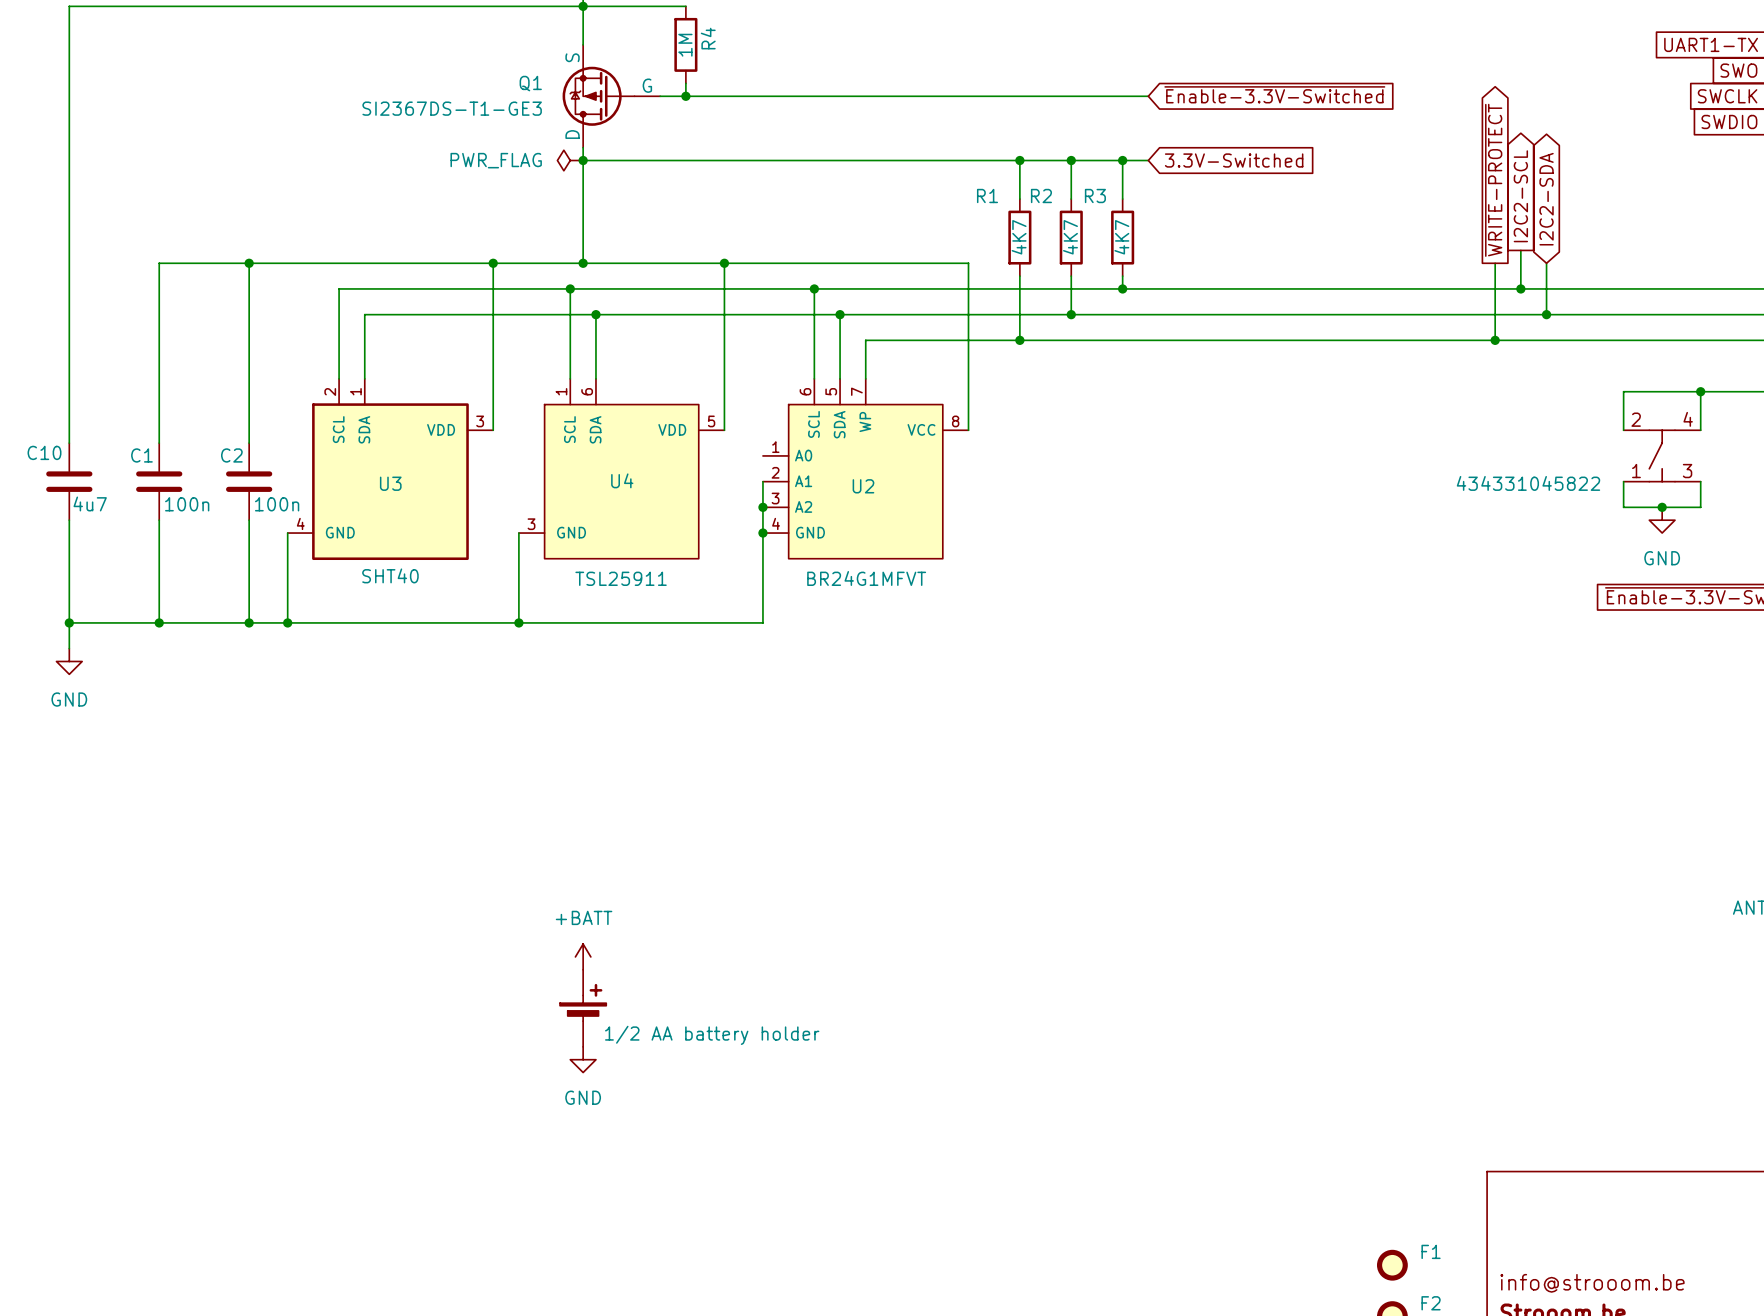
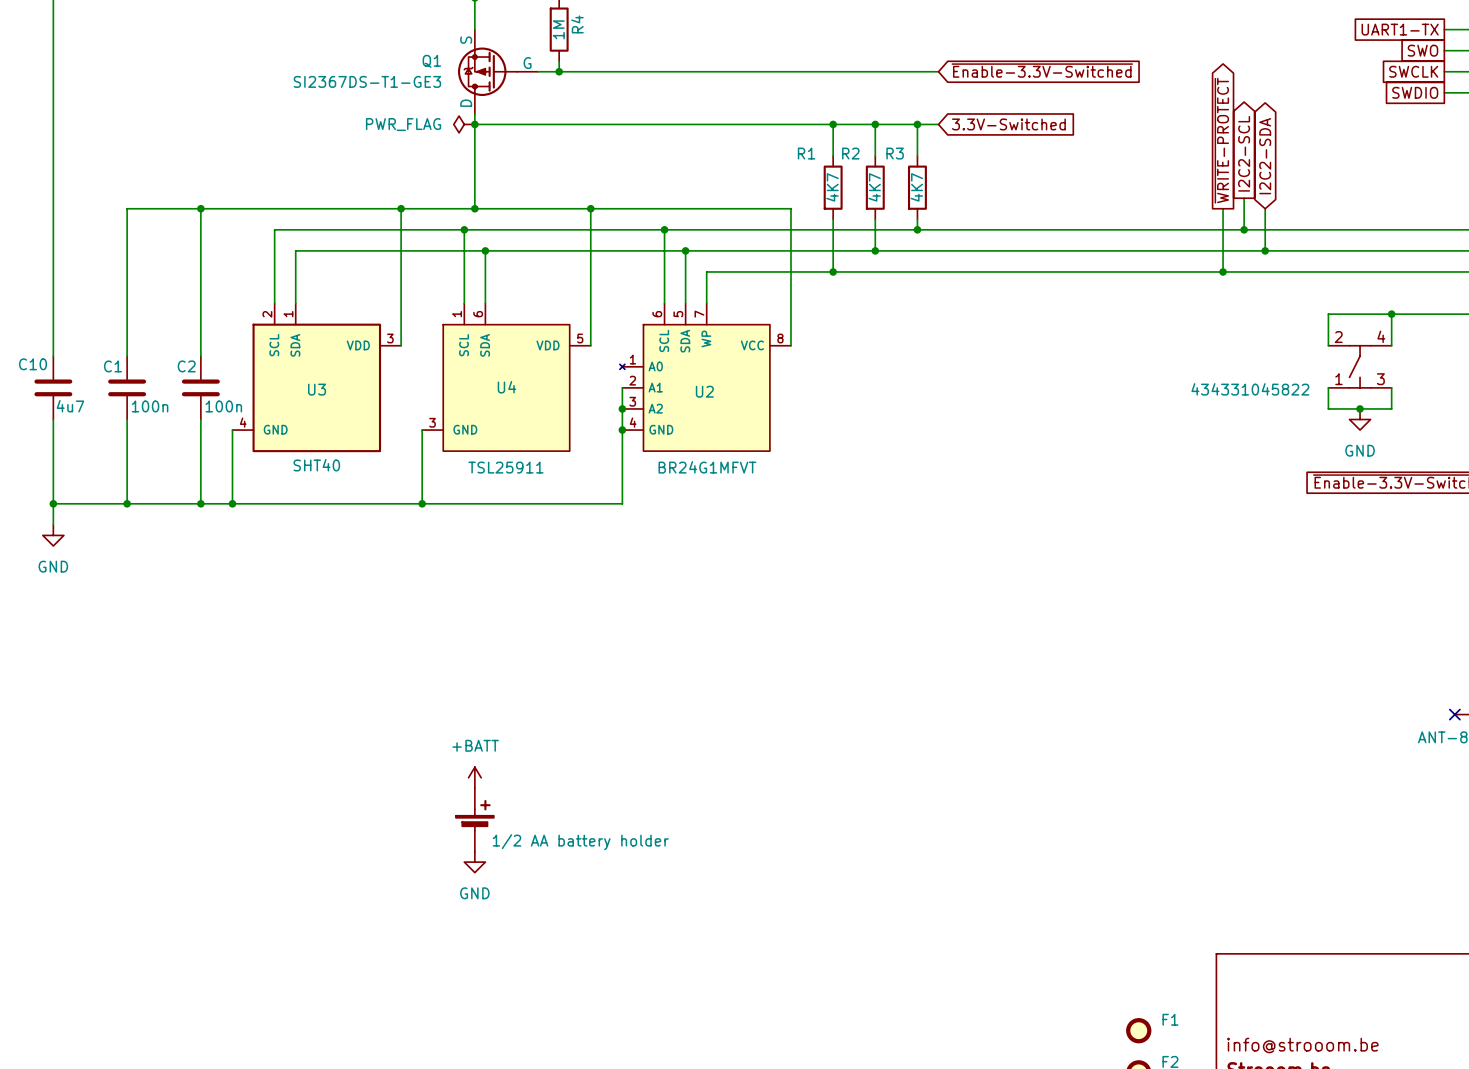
U2 symbol: [762, 378, 969, 559] -> [619, 303, 791, 452]

